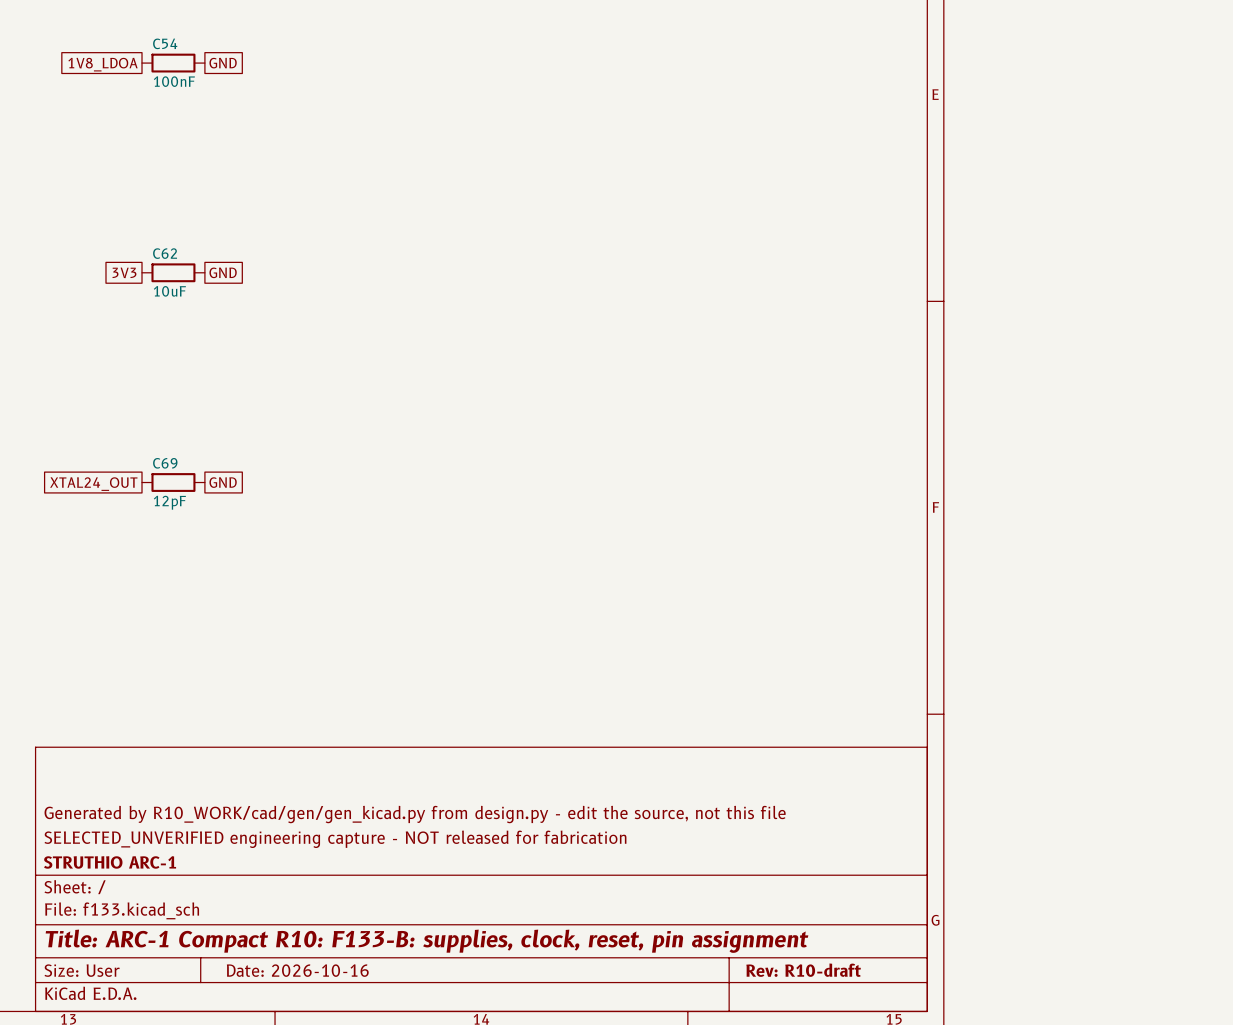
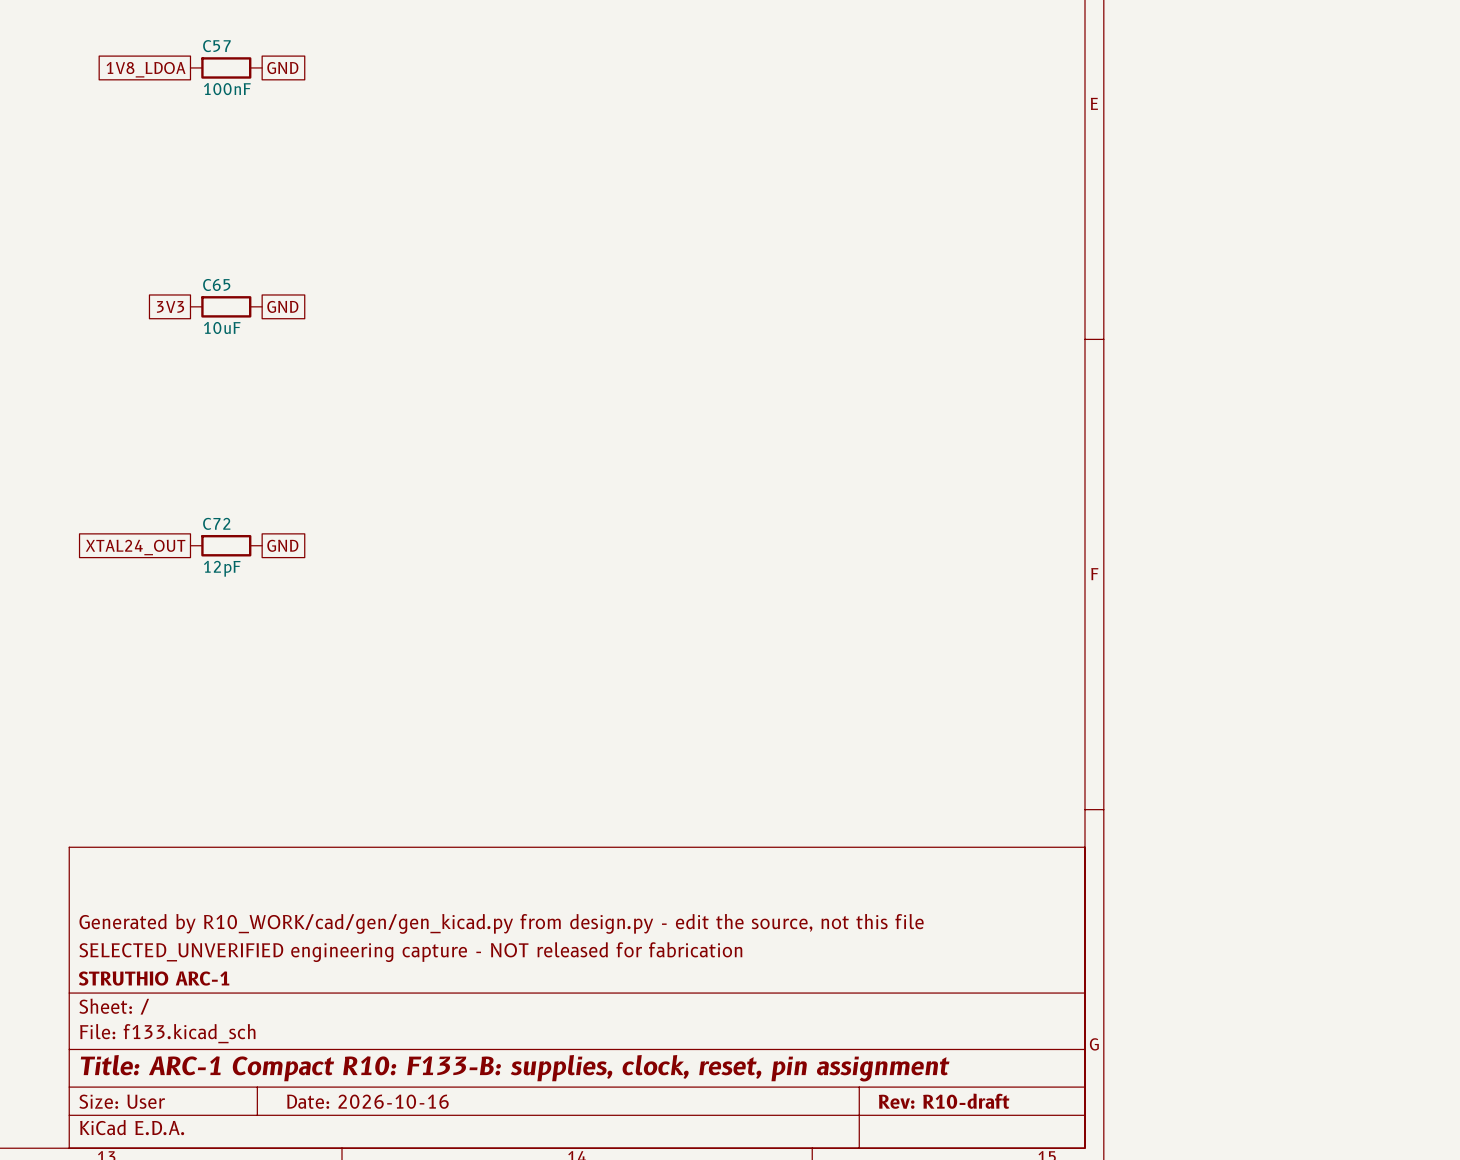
C54 name: C54 (165, 43) -> C57 (216, 46)
C62 name: C62 (165, 253) -> C65 (216, 284)
C69 name: C69 (165, 463) -> C72 (216, 523)

